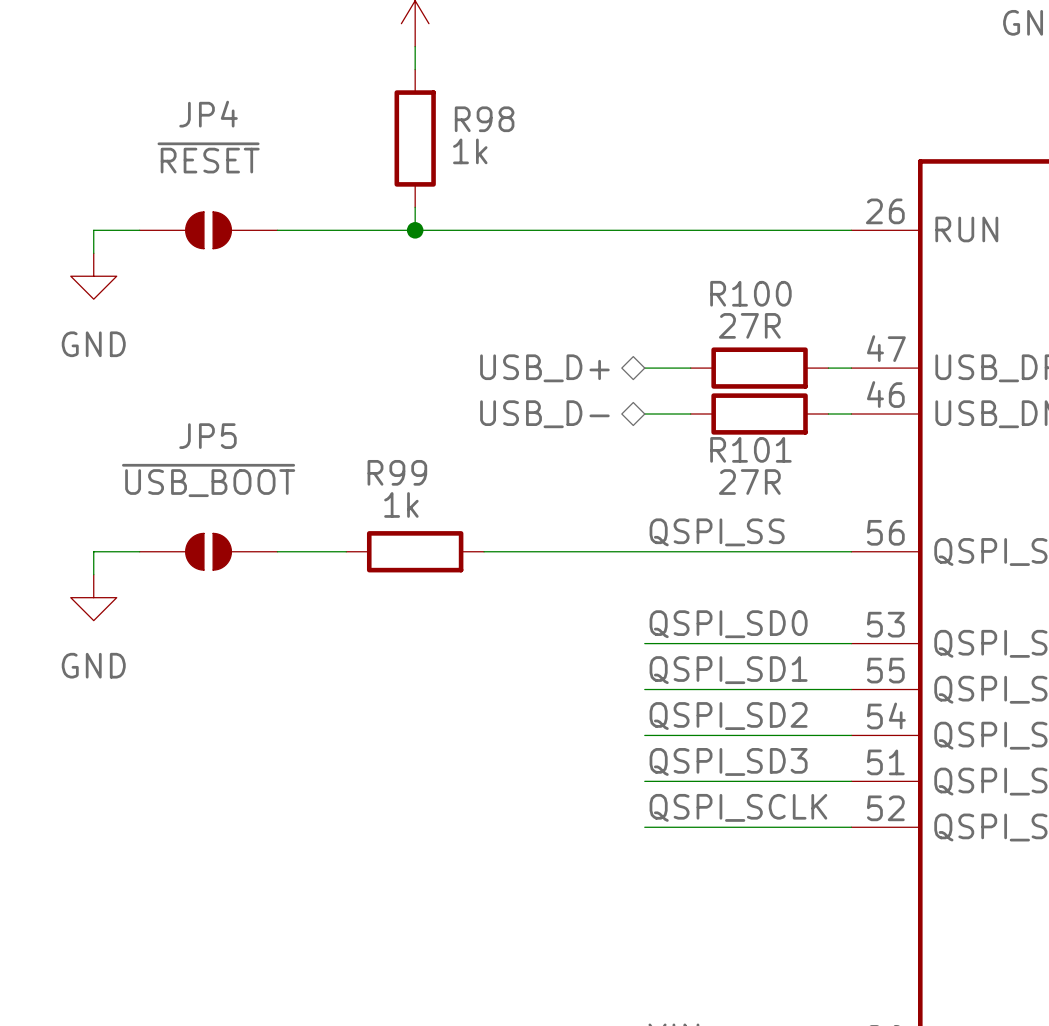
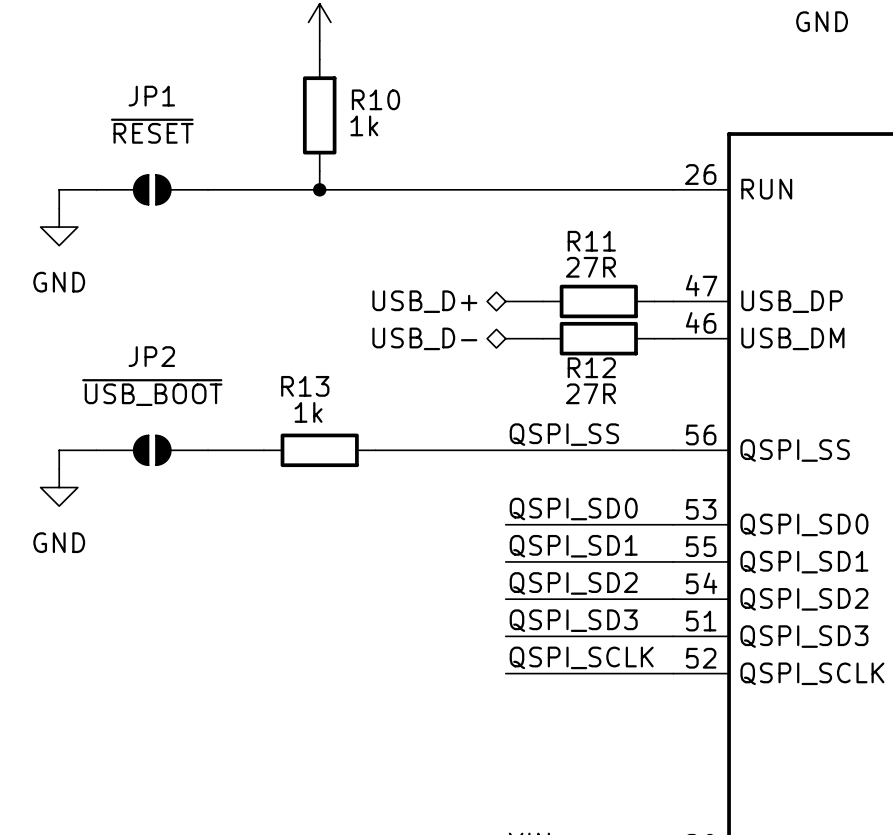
JP4 name: JP4 (208, 114) -> JP1 (151, 96)
R98 name: R98 (484, 119) -> R10 (375, 99)
R100 name: R100 (750, 293) -> R11 (591, 241)
JP5 name: JP5 (207, 436) -> JP2 (151, 356)
R101 name: R101 (750, 449) -> R12 (591, 367)
R99 name: R99 (397, 472) -> R13 (305, 386)

